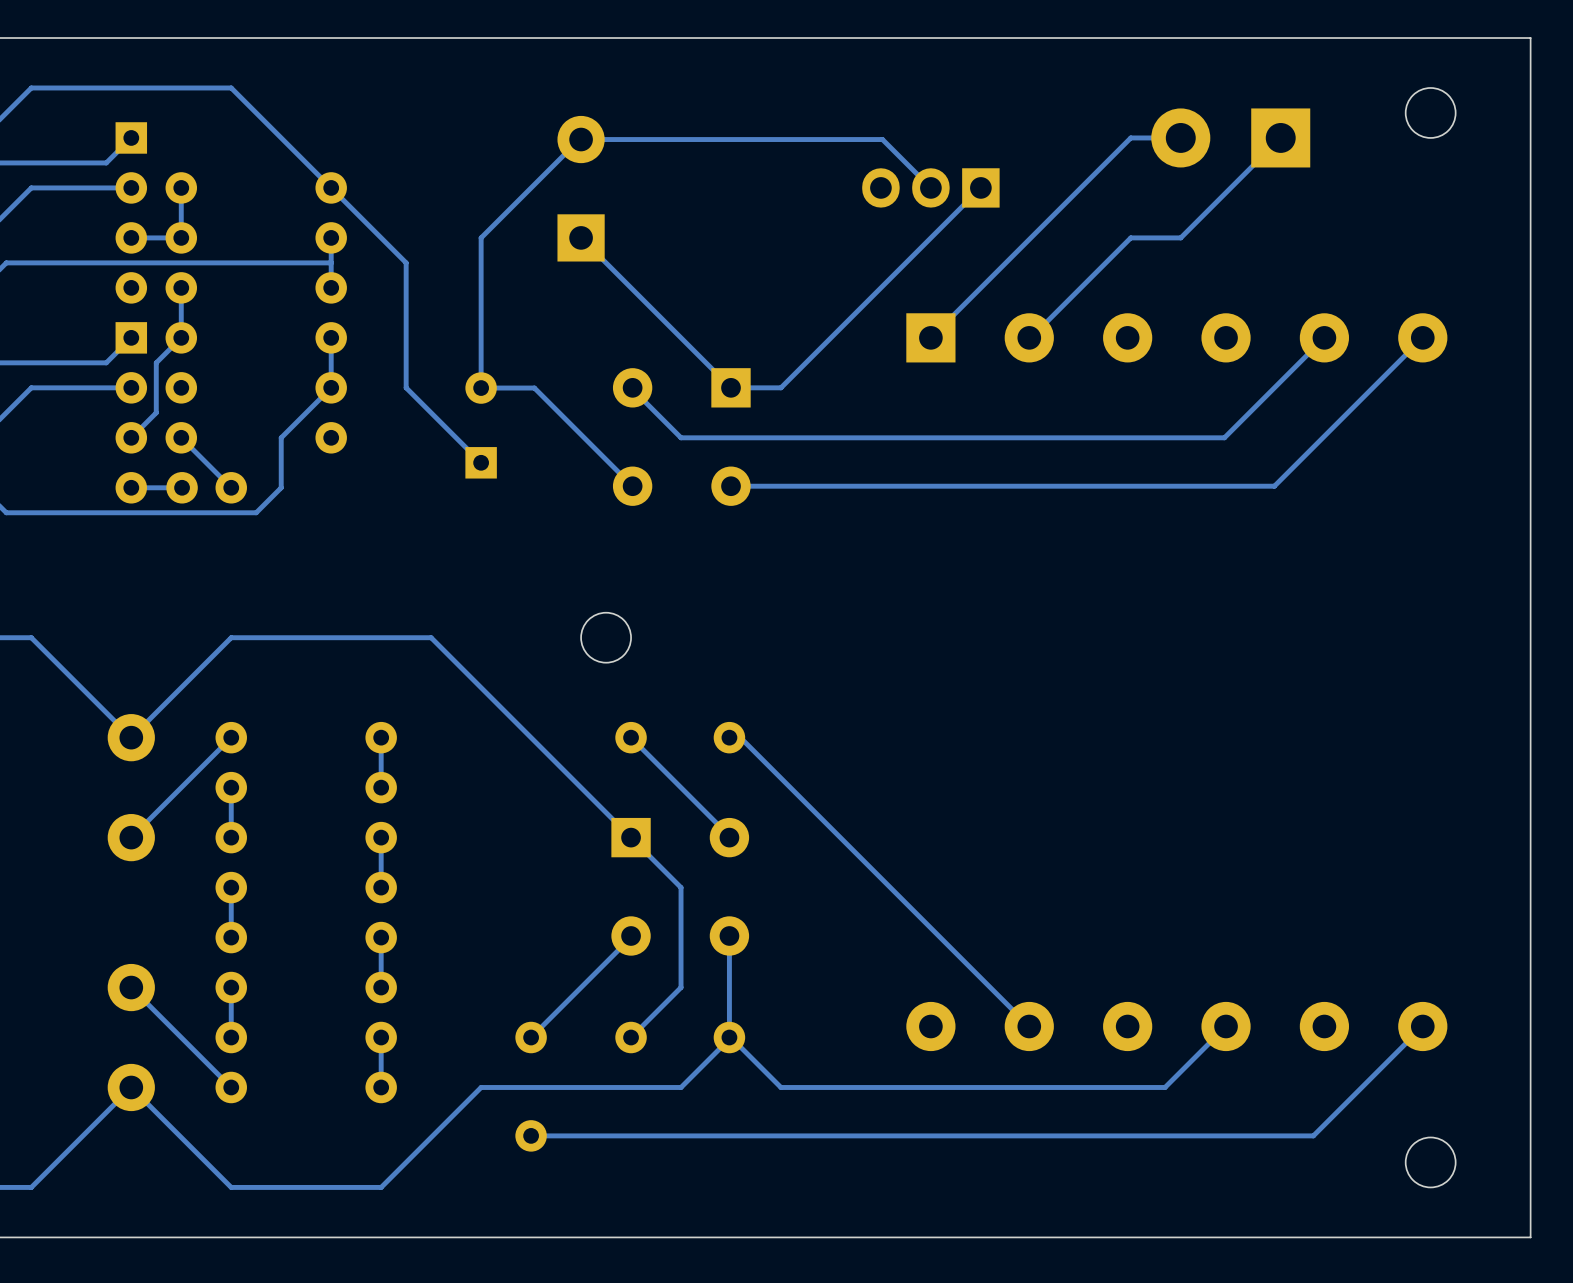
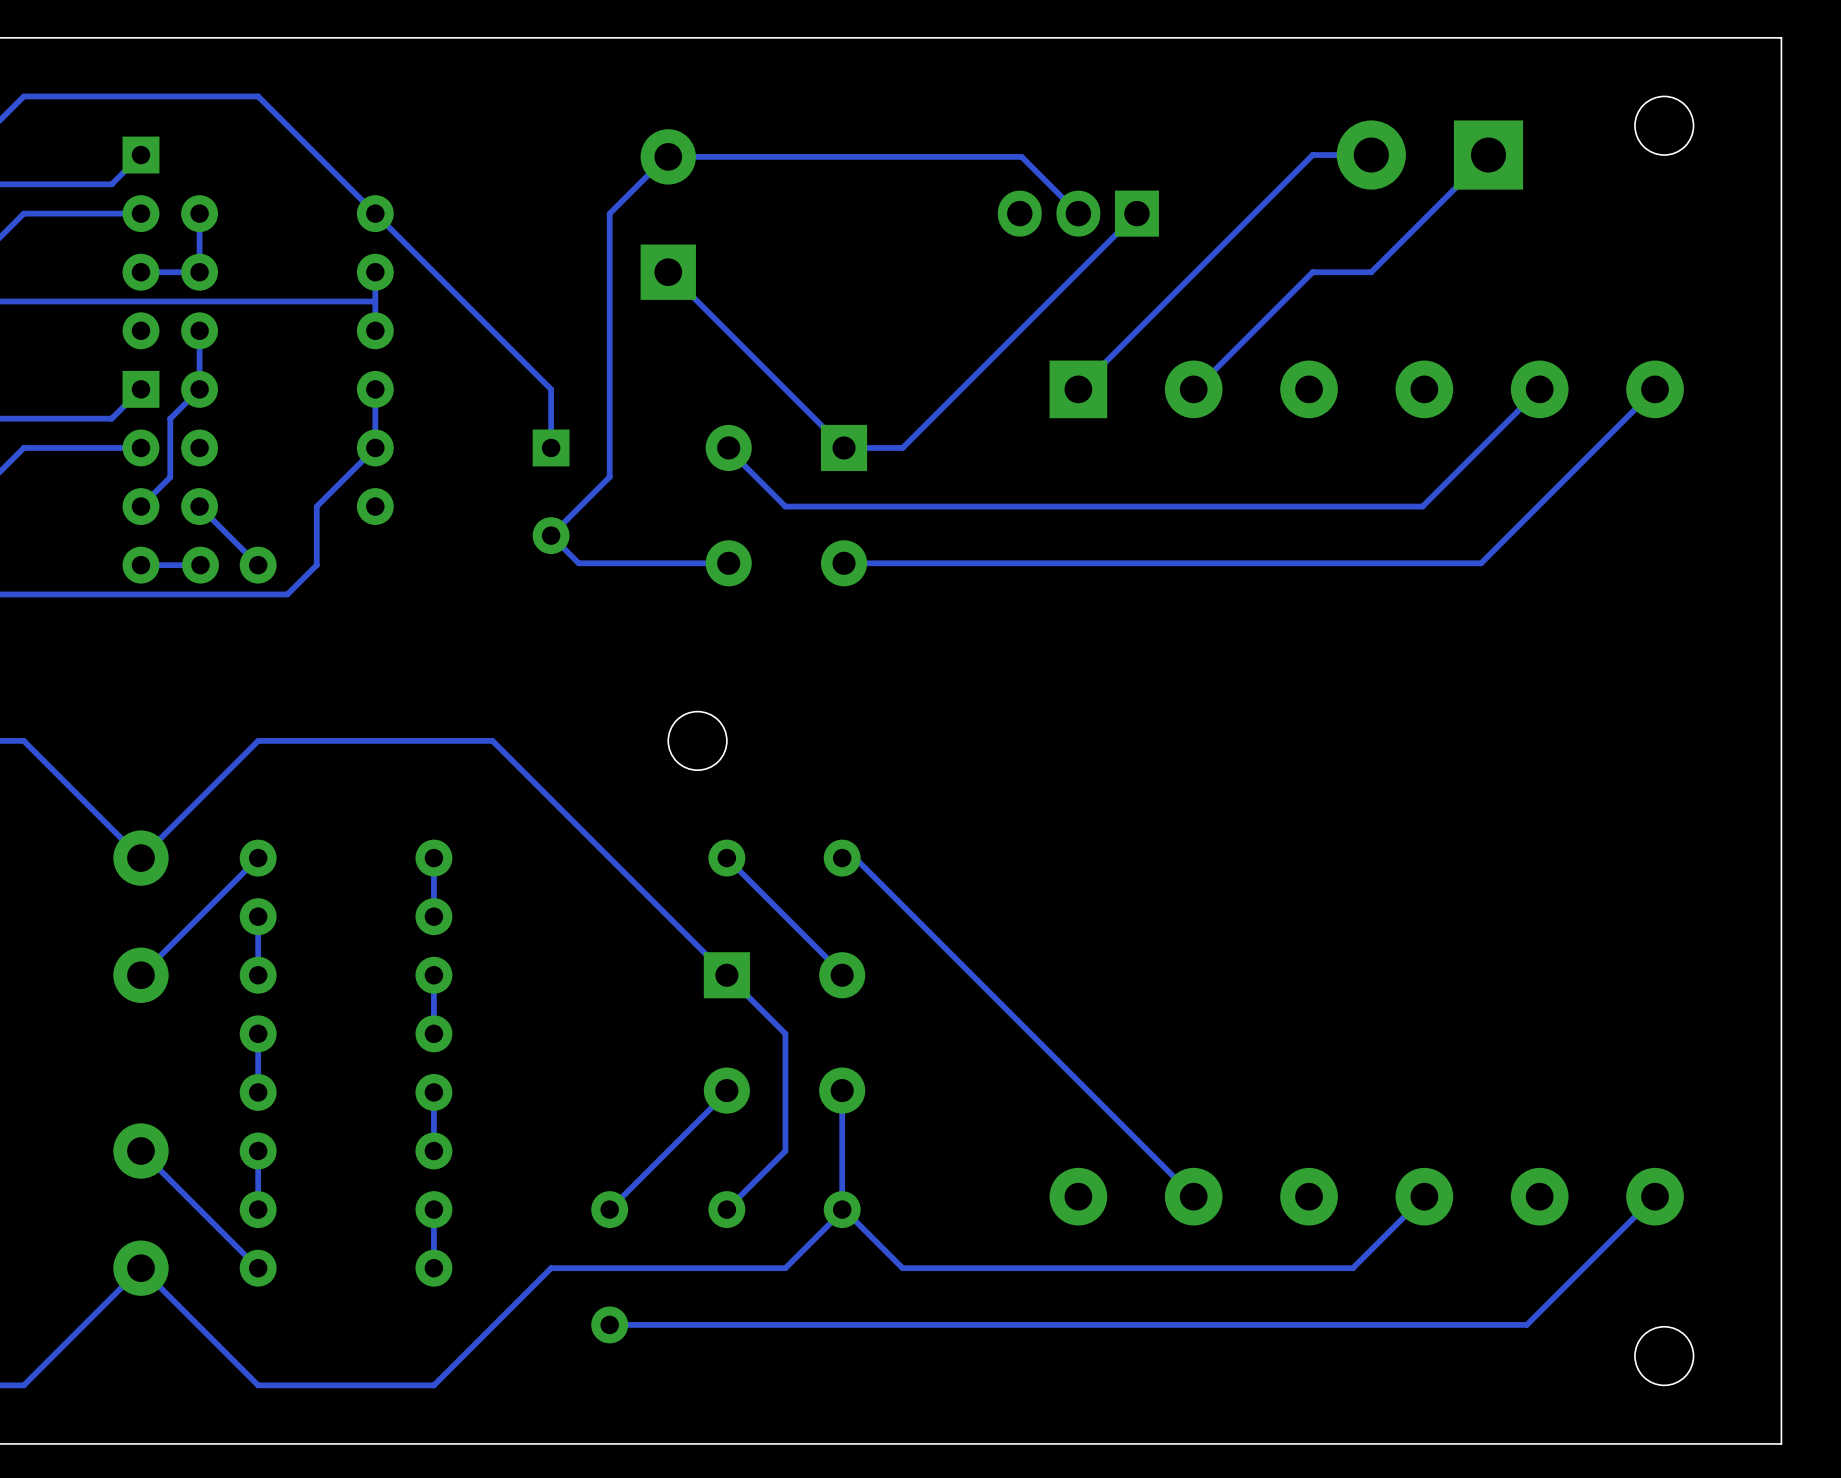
track: (531, 187) (481, 237) (481, 337) -> none
track: (406, 262) (406, 387) (481, 462) -> (463, 301) (551, 389)
track: (481, 388) (534, 388) (632, 486) -> (609, 213) (609, 477) (551, 535) (578, 563) (728, 563)
part rotation: 0° (481, 425) -> 180° (551, 491)

